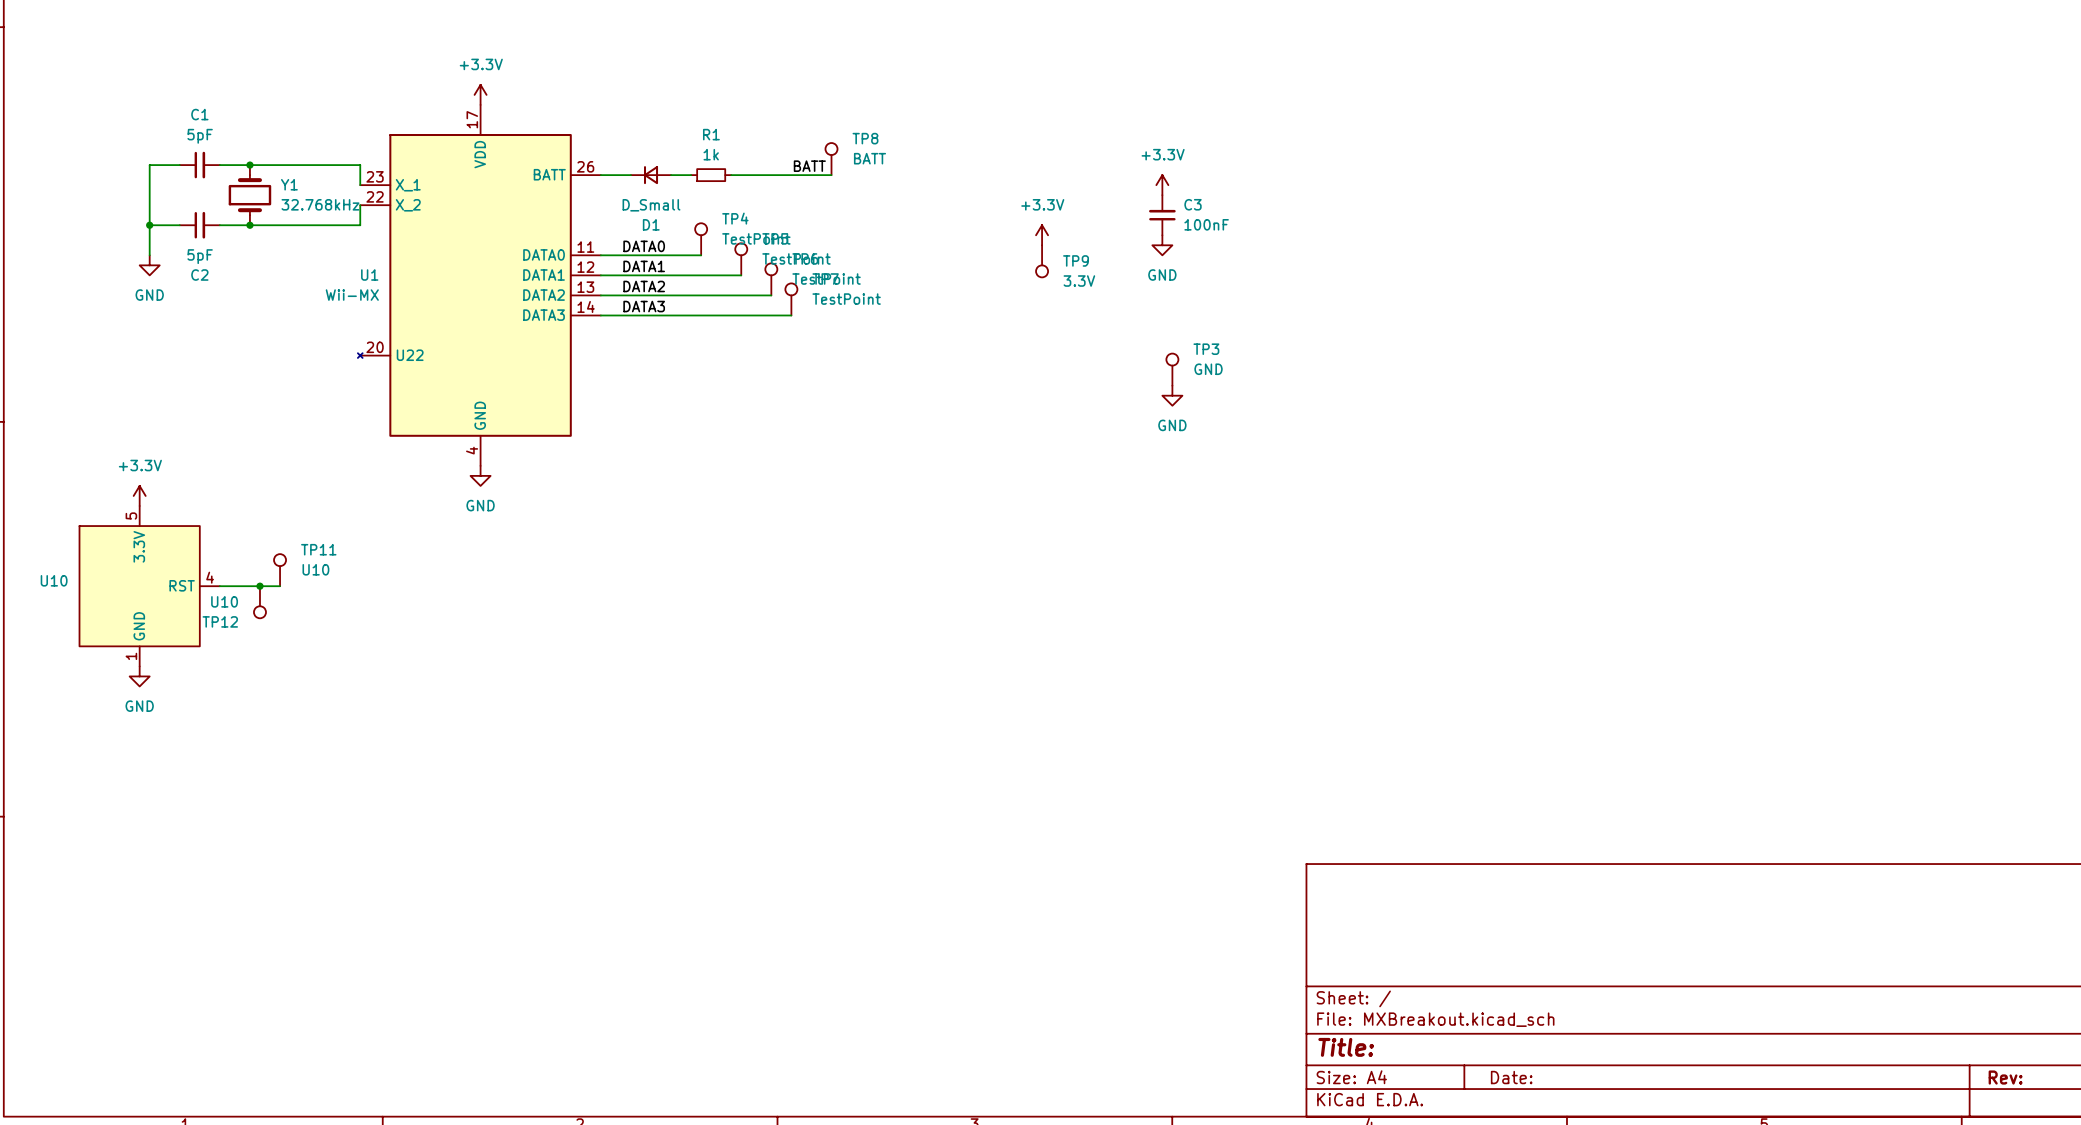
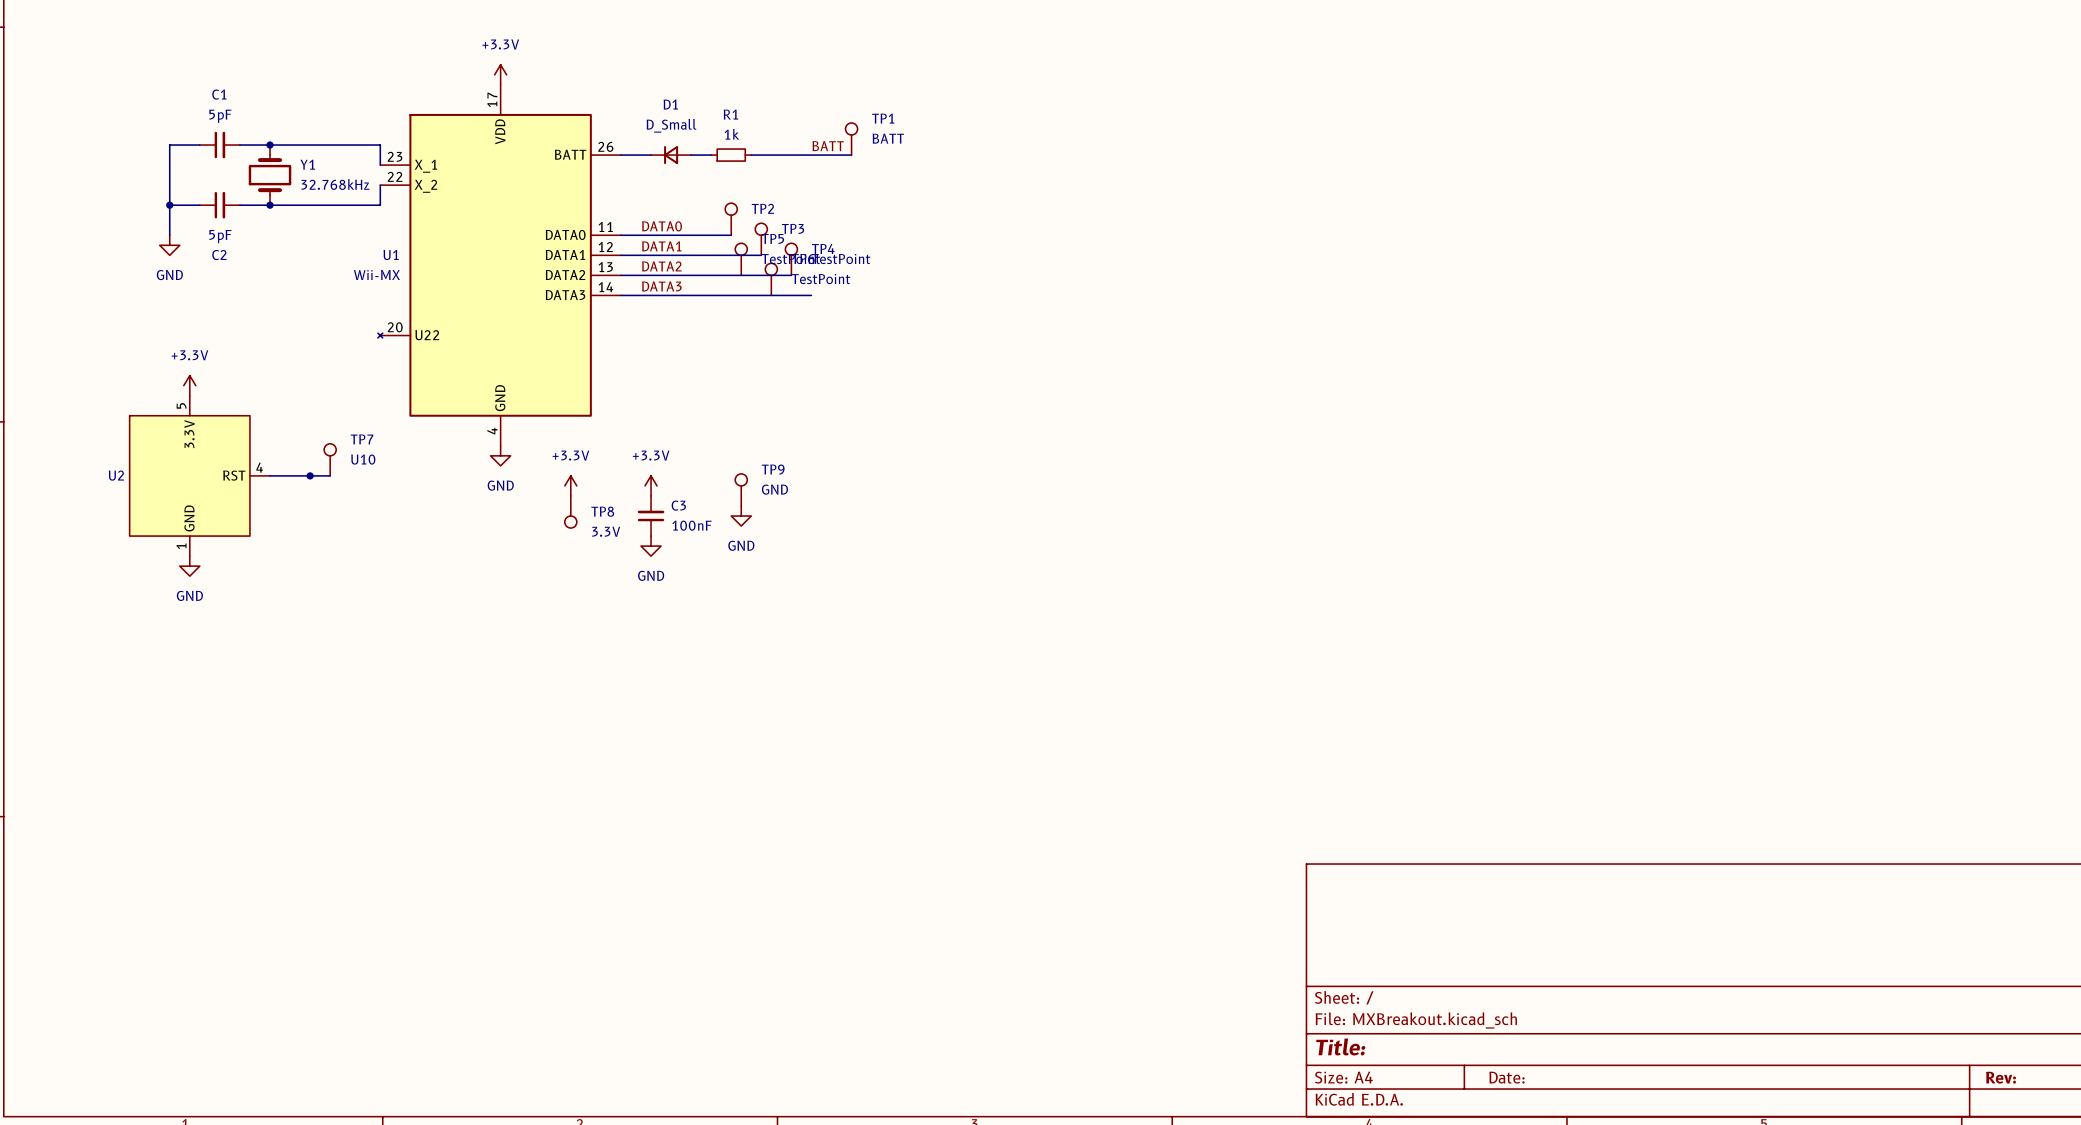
power symbol position: +3.3V (480, 94) -> +3.3V (500, 74)
TP8 name position: TP8 (865, 138) -> TP8 (602, 511)
TP1: none -> BATT (851, 139)
junction: none -> (270, 145)
TP8 rotation: 0° (831, 149) -> 180° (570, 522)
TP8 value: BATT (870, 158) -> 3.3V (606, 531)
TP8 position: (831, 159) -> (570, 512)
wire: (179, 165) (149, 165) (149, 255) -> (199, 145) (169, 145) (169, 235)
C1 position: (199, 165) -> (219, 145)
wire: (219, 165) (360, 165) (360, 185) -> (239, 145) (380, 145) (380, 165)
junction: (249, 165) -> none
label position: BATT (809, 166) -> BATT (828, 146)
wire: (600, 175) (630, 175) -> (620, 155) (651, 155)
D1 position: (651, 175) -> (671, 155)
wire: (671, 175) (691, 175) -> (691, 155) (711, 155)
R1 position: (711, 175) -> (731, 155)
wire: (731, 175) (831, 175) -> (751, 155) (851, 155)
power symbol: +3.3V (1162, 185) -> none
Y1 position: (249, 195) -> (270, 175)
junction: none -> (270, 205)
wire: (360, 205) (360, 225) (219, 225) -> (380, 185) (380, 205) (239, 205)
D1 value position: D_Small (651, 205) -> D_Small (671, 125)
C3 position: (1162, 215) -> (651, 516)
TP4 name position: TP4 (735, 218) -> TP4 (823, 248)
TP2: none -> (731, 219)
D1 name position: D1 (651, 224) -> D1 (670, 104)
wire: (149, 225) (179, 225) -> (169, 205) (199, 205)
junction position: (149, 225) -> (169, 205)
C2 position: (199, 225) -> (219, 205)
junction: (249, 225) -> none
wire: none -> (620, 235) (731, 235)
power symbol: +3.3V (1042, 235) -> none
TP4 position: (701, 239) -> (791, 259)
power symbol: GND (1162, 245) -> none
label position: DATA0 (644, 246) -> DATA0 (662, 226)
wire: none -> (701, 255) (761, 255)
TP9 name position: TP9 (1076, 260) -> TP9 (773, 469)
TP9 position: (1042, 261) -> (741, 489)
power symbol position: GND (149, 265) -> GND (169, 245)
label position: DATA1 (644, 266) -> DATA1 (661, 246)
TP9 rotation: 0° (1042, 271) -> 180° (741, 479)
wire: none -> (741, 275) (791, 275)
TP9 value: 3.3V (1079, 281) -> GND (774, 489)
U1 position: (479, 285) -> (499, 265)
label position: DATA2 (644, 286) -> DATA2 (661, 266)
wire: none -> (771, 295) (811, 295)
TP7 position: (791, 299) -> (330, 459)
TP7 value: TestPoint (846, 299) -> U10 (363, 459)
label position: DATA3 (644, 306) -> DATA3 (661, 286)
wire: (600, 315) (791, 315) -> none
TP3 name position: TP3 (1206, 349) -> TP3 (793, 228)
TP3 position: (1172, 369) -> (761, 239)
TP3 value: GND (1208, 369) -> none
power symbol: GND (1172, 395) -> none
U2: none -> (199, 475)
junction: none -> (310, 475)
power symbol position: GND (480, 475) -> GND (500, 455)
power symbol: none -> +3.3V (570, 485)
power symbol: none -> +3.3V (651, 485)
power symbol position: +3.3V (139, 495) -> +3.3V (189, 385)
power symbol: none -> GND (741, 516)
power symbol: none -> GND (651, 546)
TP11: U10 (280, 570) -> none
U10: (149, 586) -> none
wire: (219, 586) (280, 586) -> (270, 475) (330, 475)
junction: (259, 586) -> none
TP12: U10 (259, 602) -> none
power symbol position: GND (139, 676) -> GND (189, 566)

